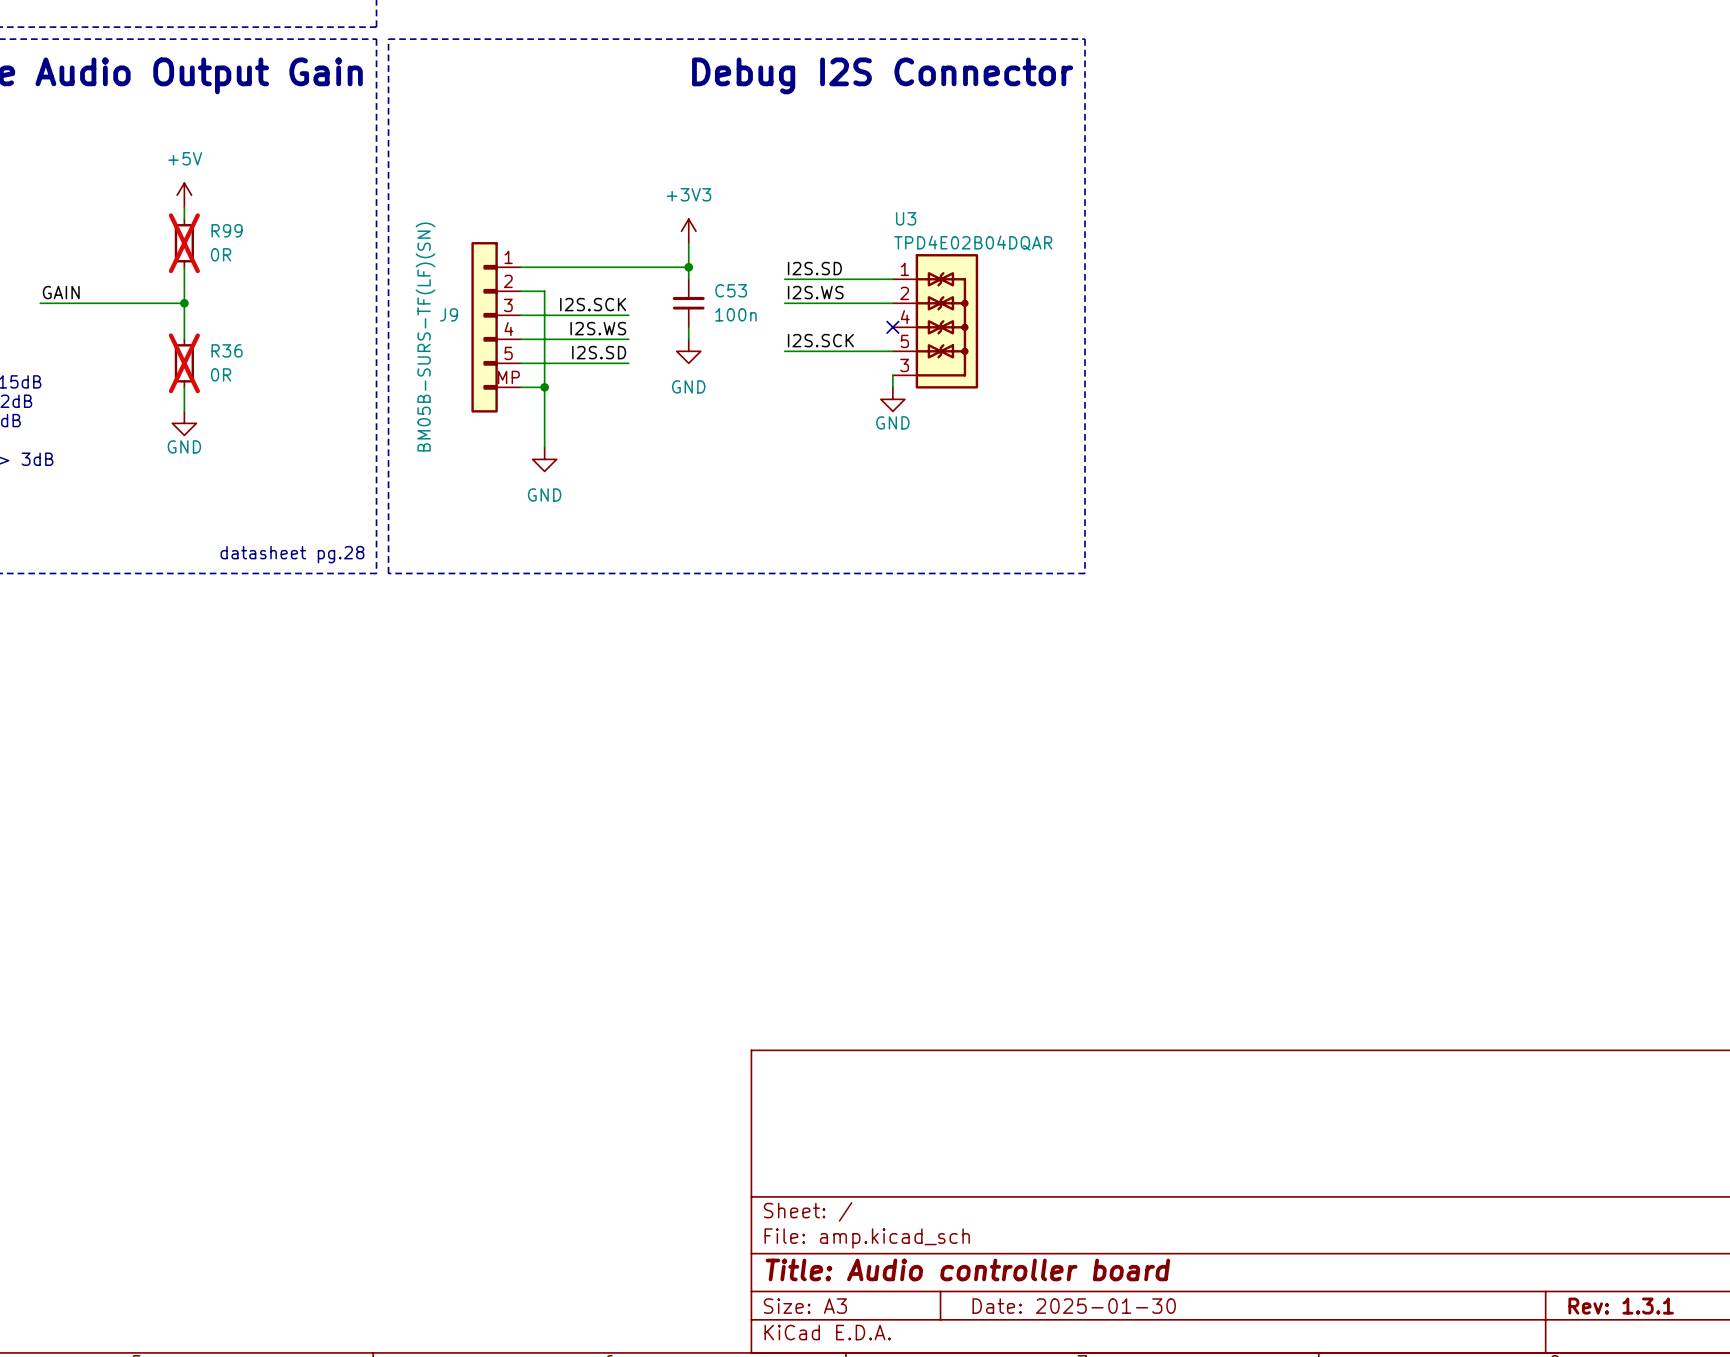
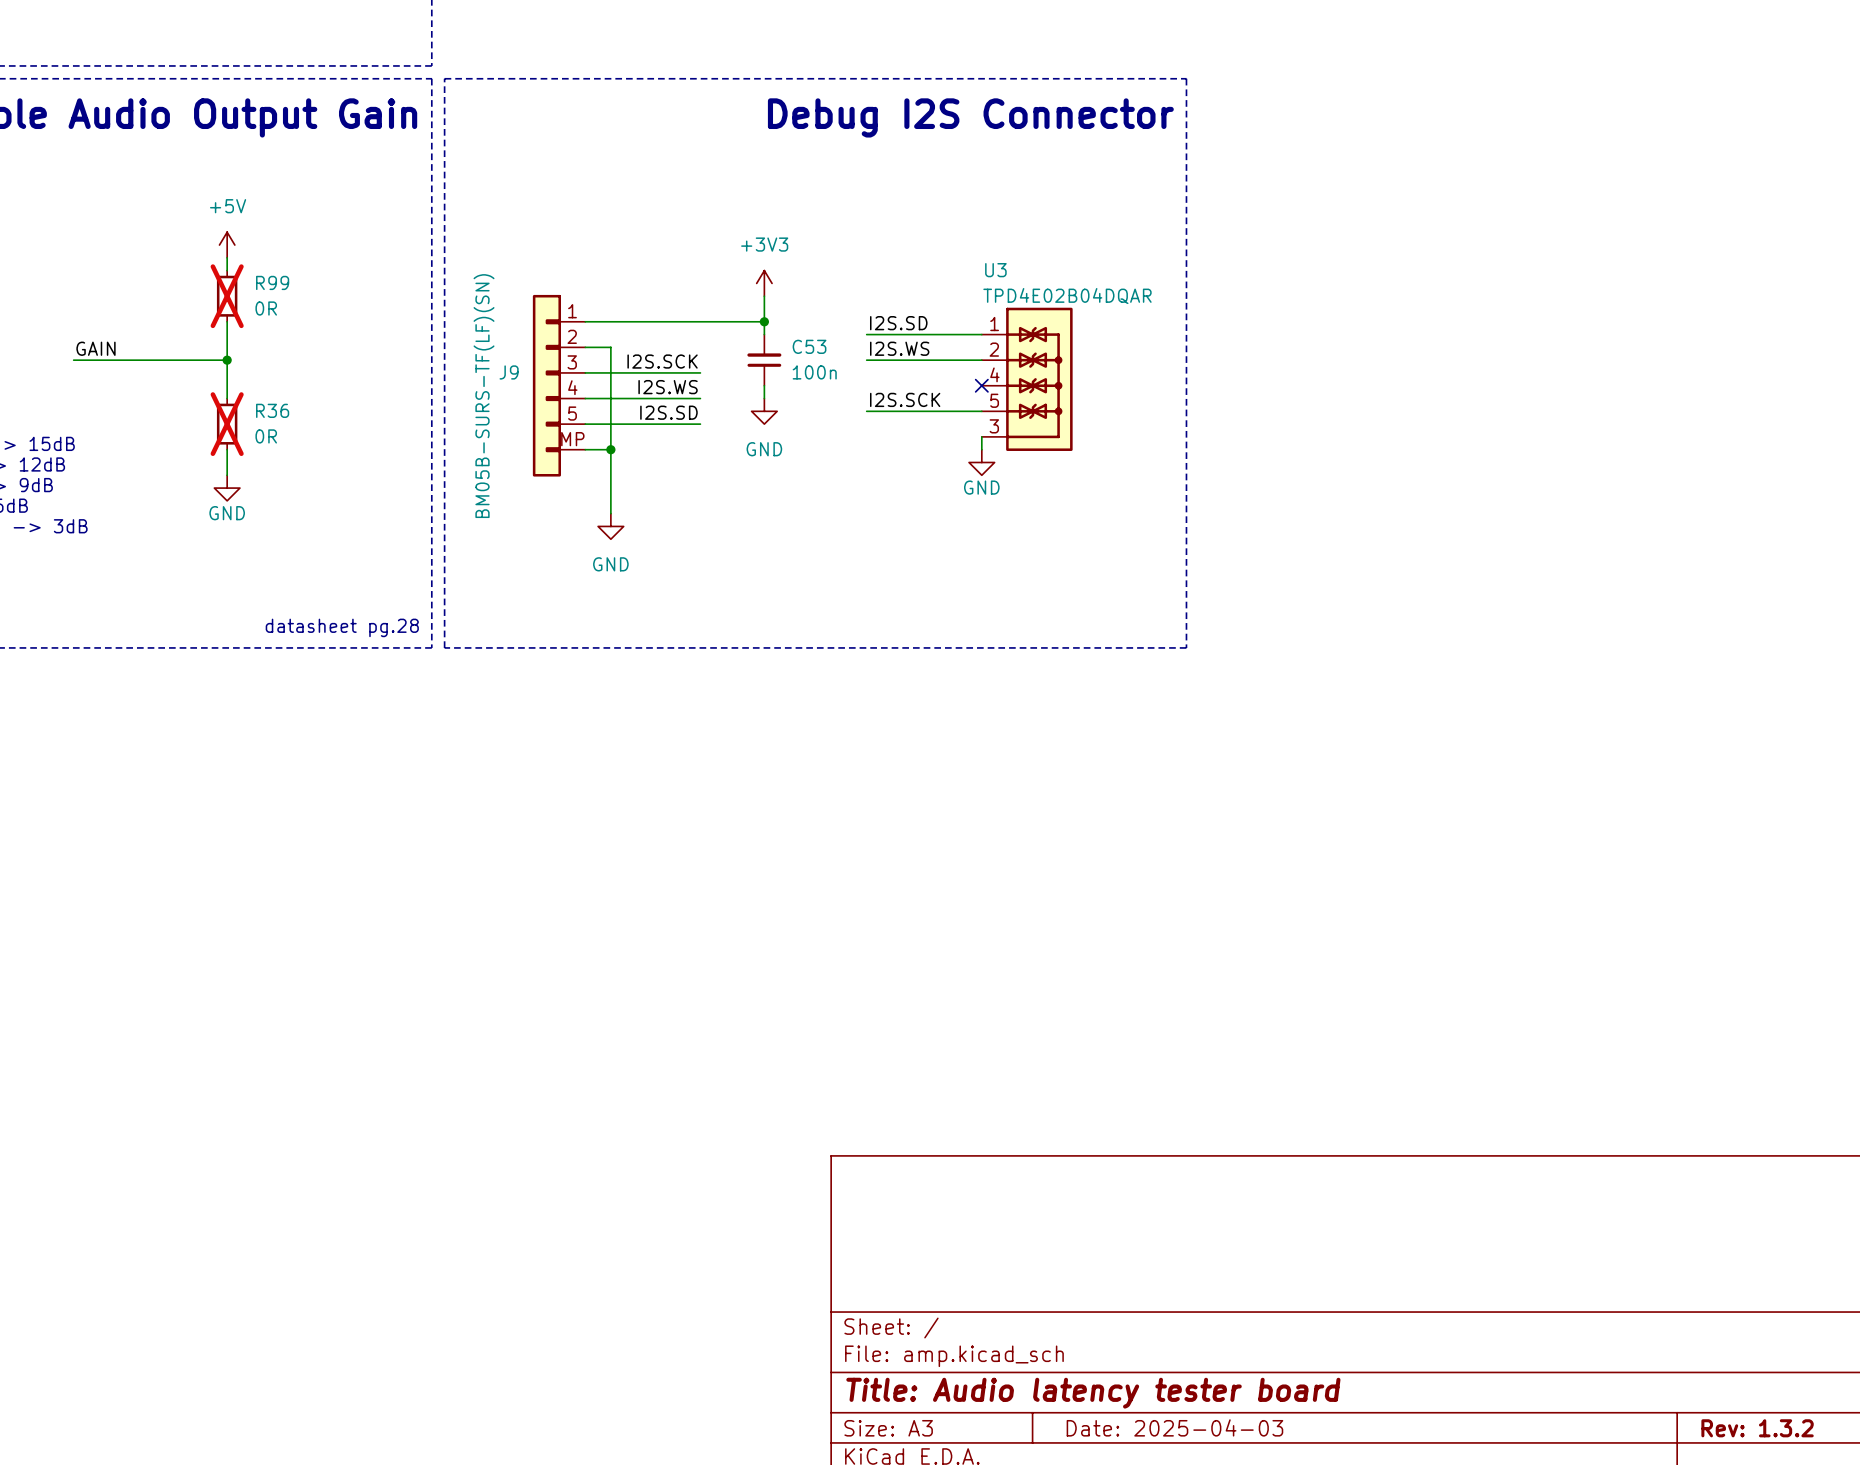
title block: Title: Audio controller board (967, 1269) -> Title: Audio latency tester board (1093, 1393)
title block: Date: 2025-01-30 (1074, 1306) -> Date: 2025-04-03 (1174, 1427)
title block: Rev: 1.3.1 (1621, 1306) -> Rev: 1.3.2 (1757, 1428)

